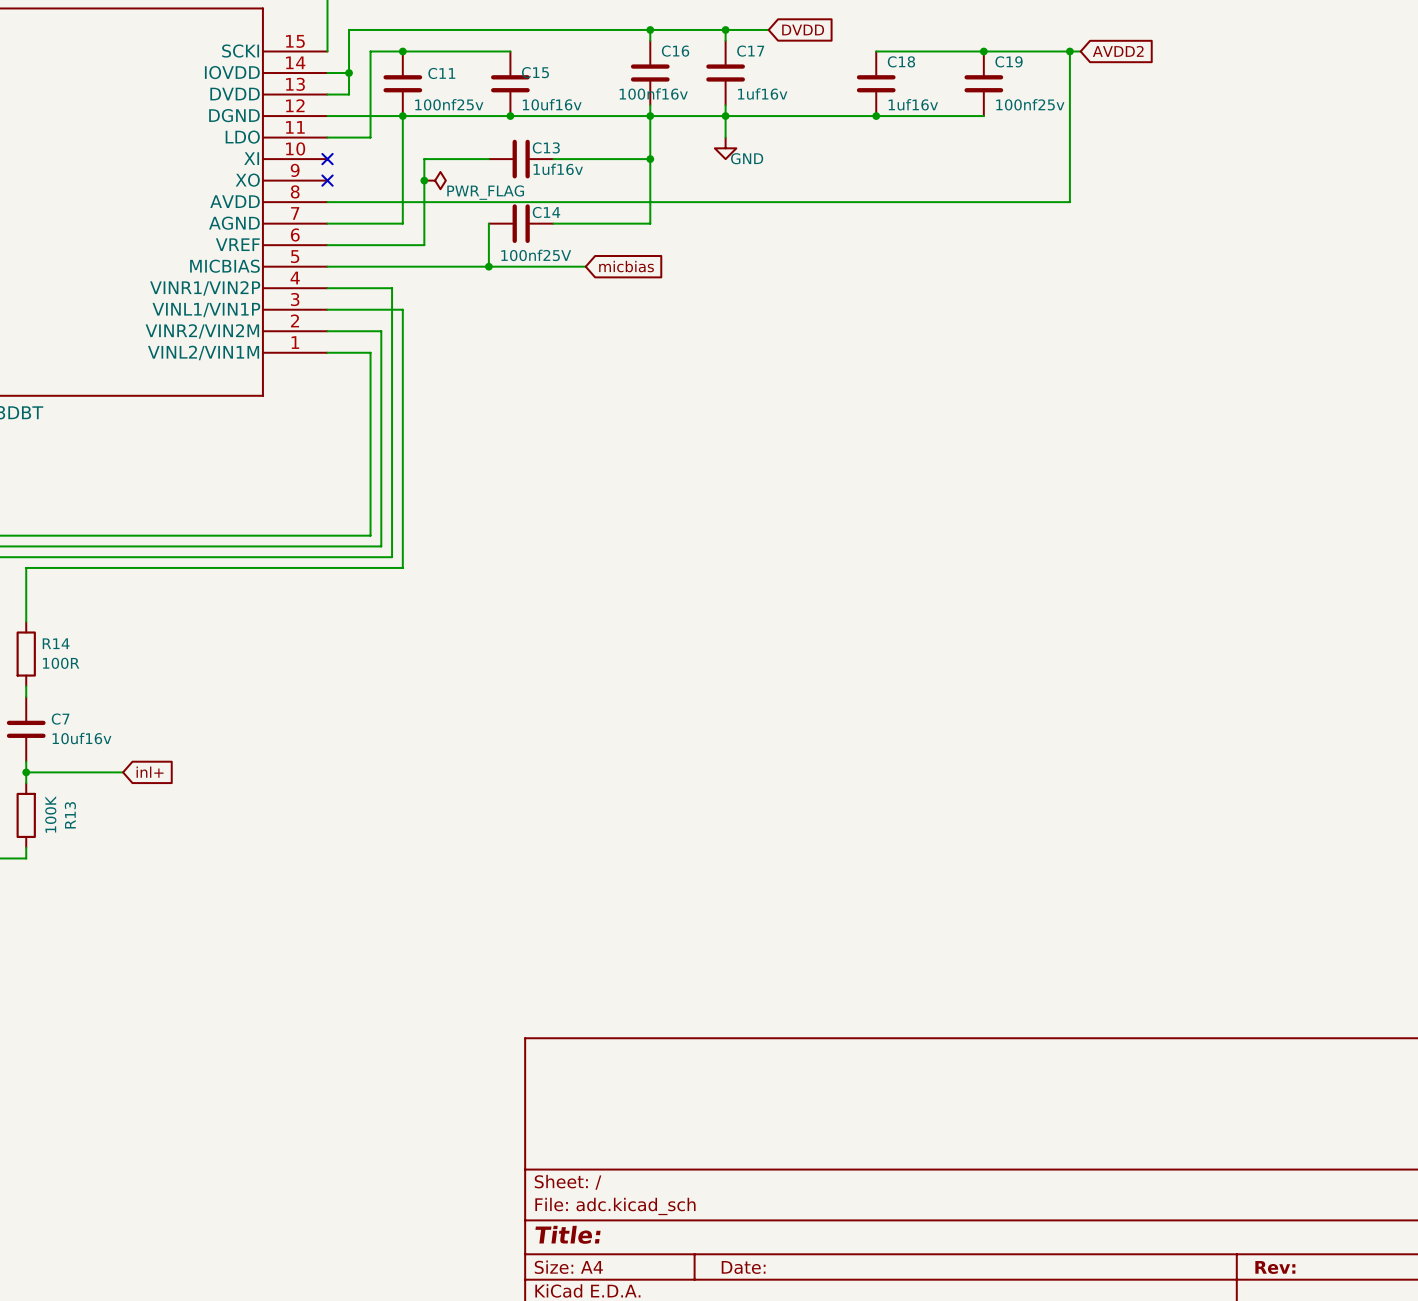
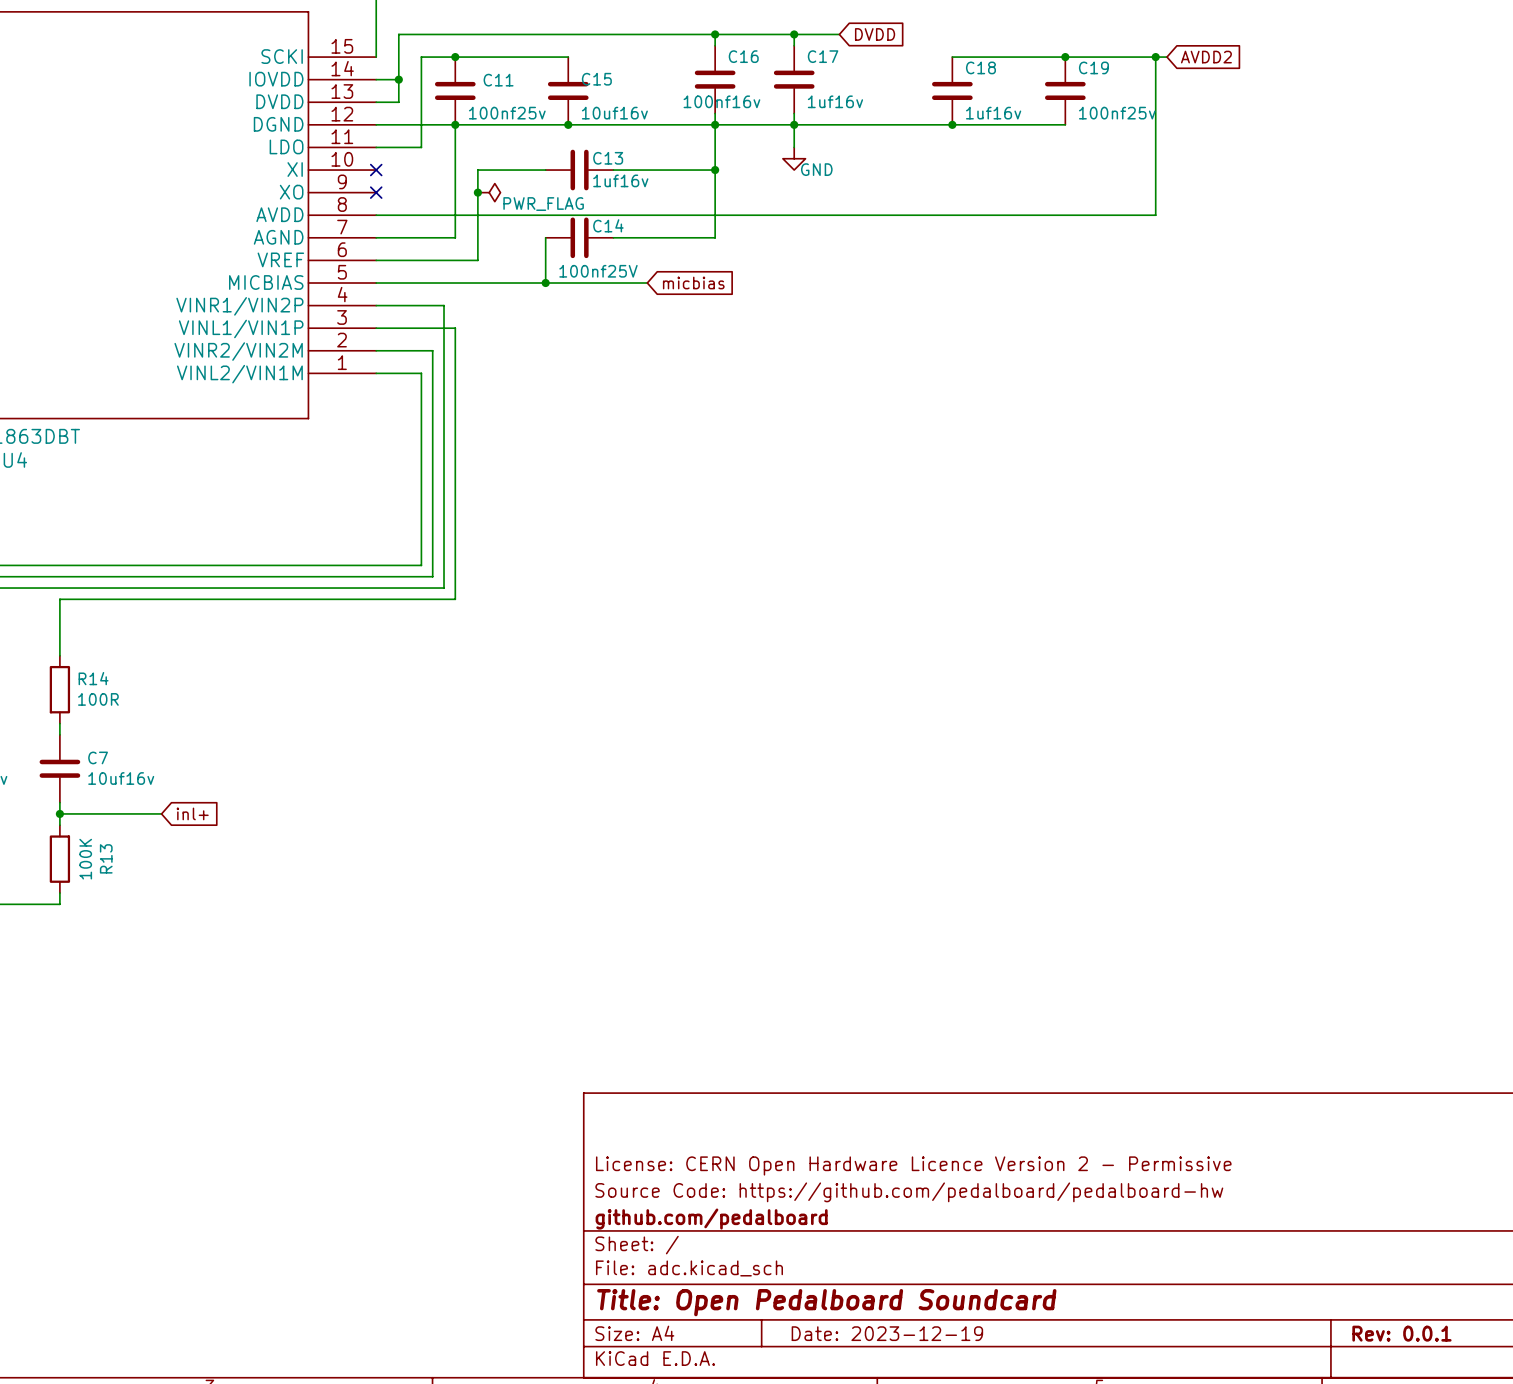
title block: none -> License: CERN Open Hardware Licence Version 2 - Permissive (913, 1165)
title block: none -> Source Code: https://github.com/pedalboard/pedalboard-hw (909, 1192)
title block: none -> github.com/pedalboard (711, 1219)
title block: Title: (568, 1234) -> Title: Open Pedalboard Soundcard (826, 1302)
title block: Date: (743, 1267) -> Date: 2023-12-19 (887, 1333)
title block: Rev: (1275, 1267) -> Rev: 0.0.1 (1401, 1333)

